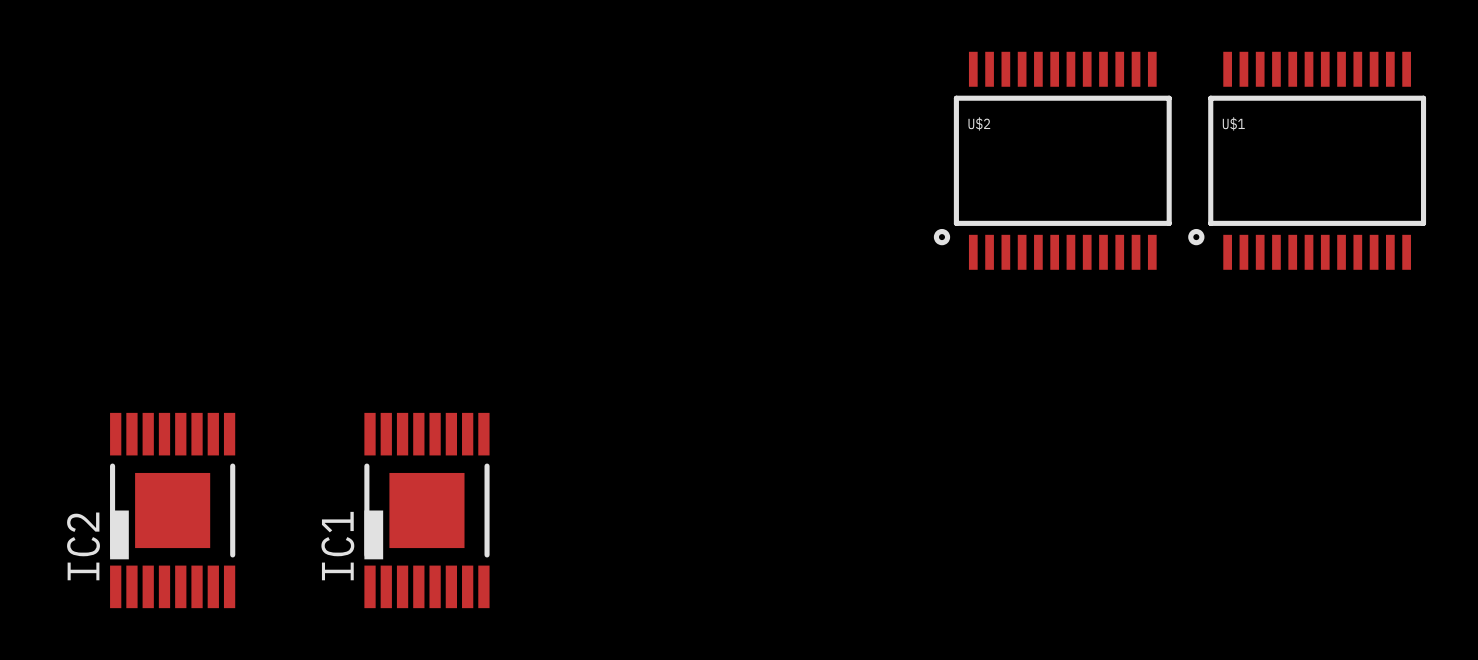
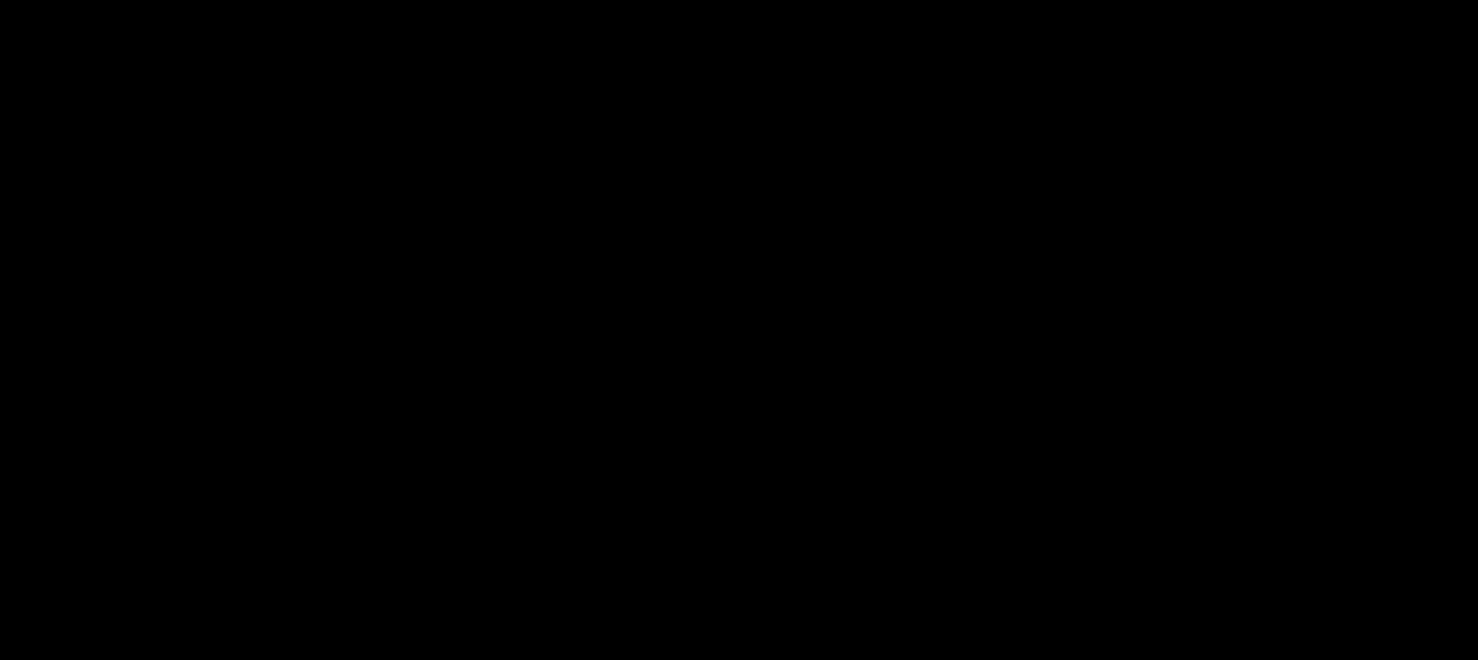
U$2: (1052, 160) -> none
U$1: (1307, 160) -> none
IC2: (172, 510) -> none
IC1: (426, 510) -> none

